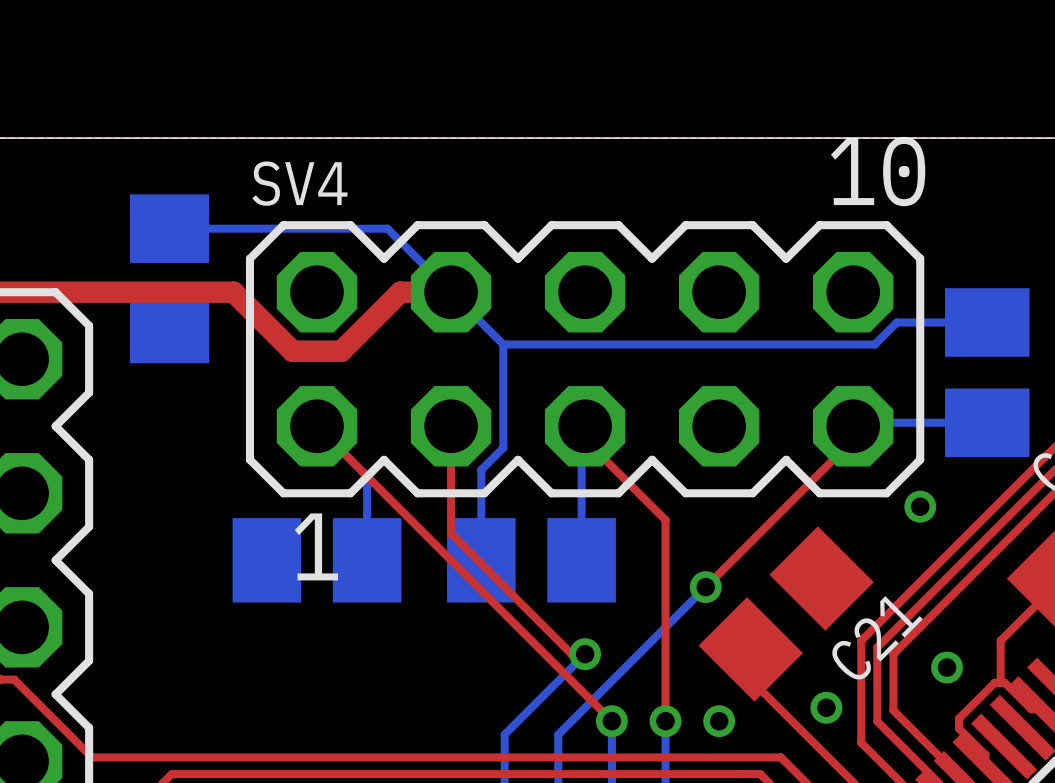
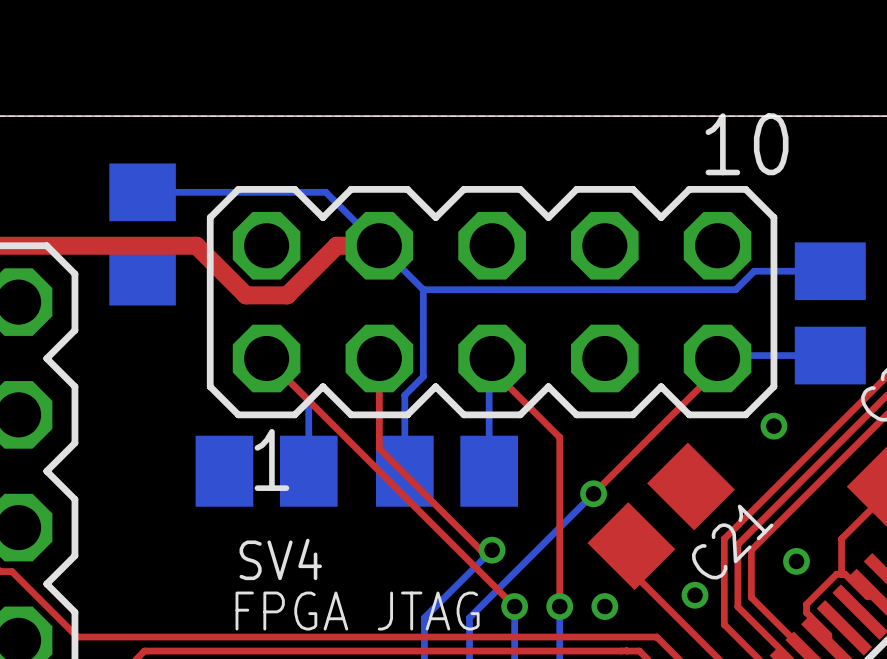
SV4 name position: SV4 (299, 183) -> SV4 (280, 559)
text: none -> FPGA JTAG (357, 611)

